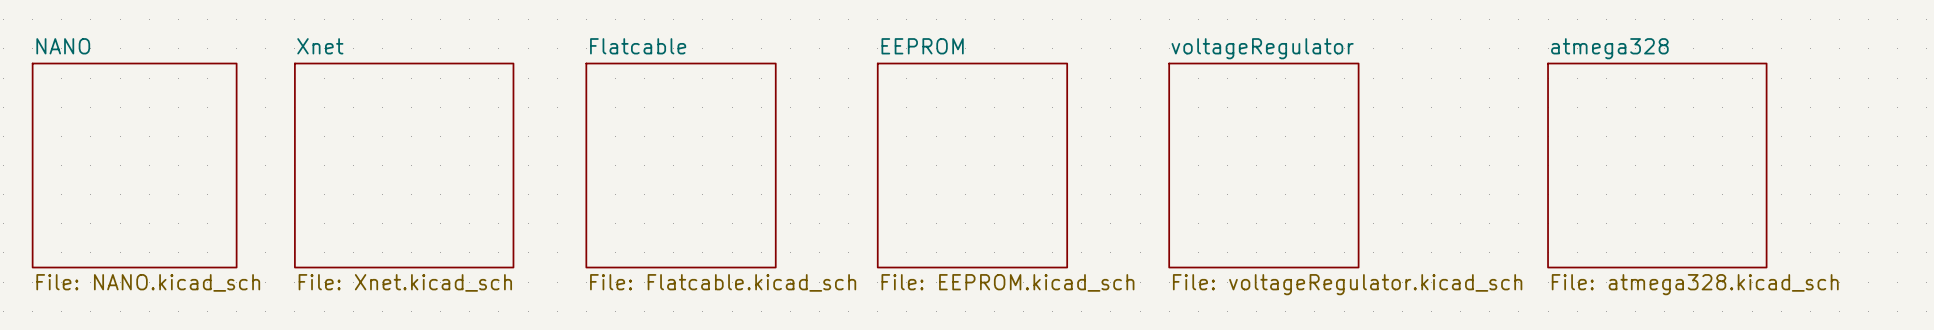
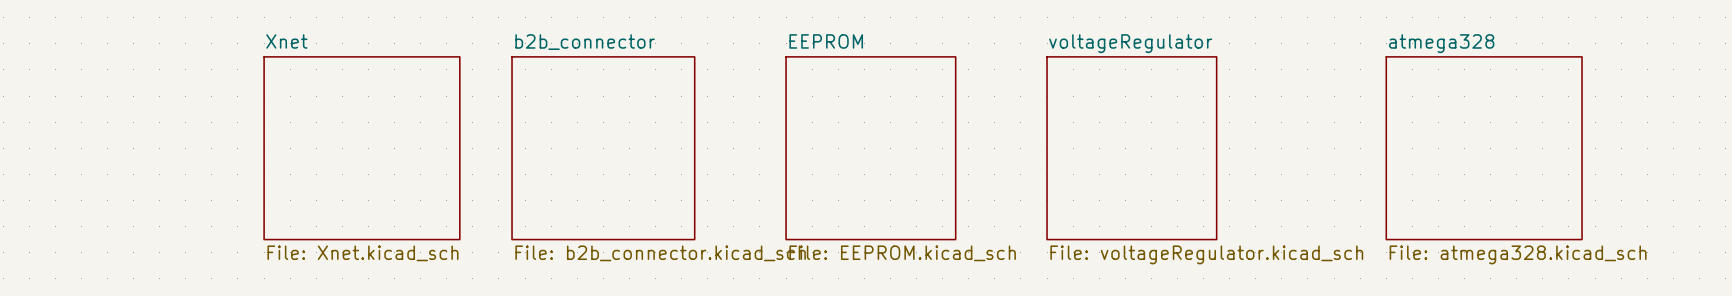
sheet NANO: File: NANO.kicad_sch (134, 165) -> none
sheet b2b_connector: none -> File: b2b_connector.kicad_sch (603, 148)
sheet Flatcable: File: Flatcable.kicad_sch (681, 165) -> none

